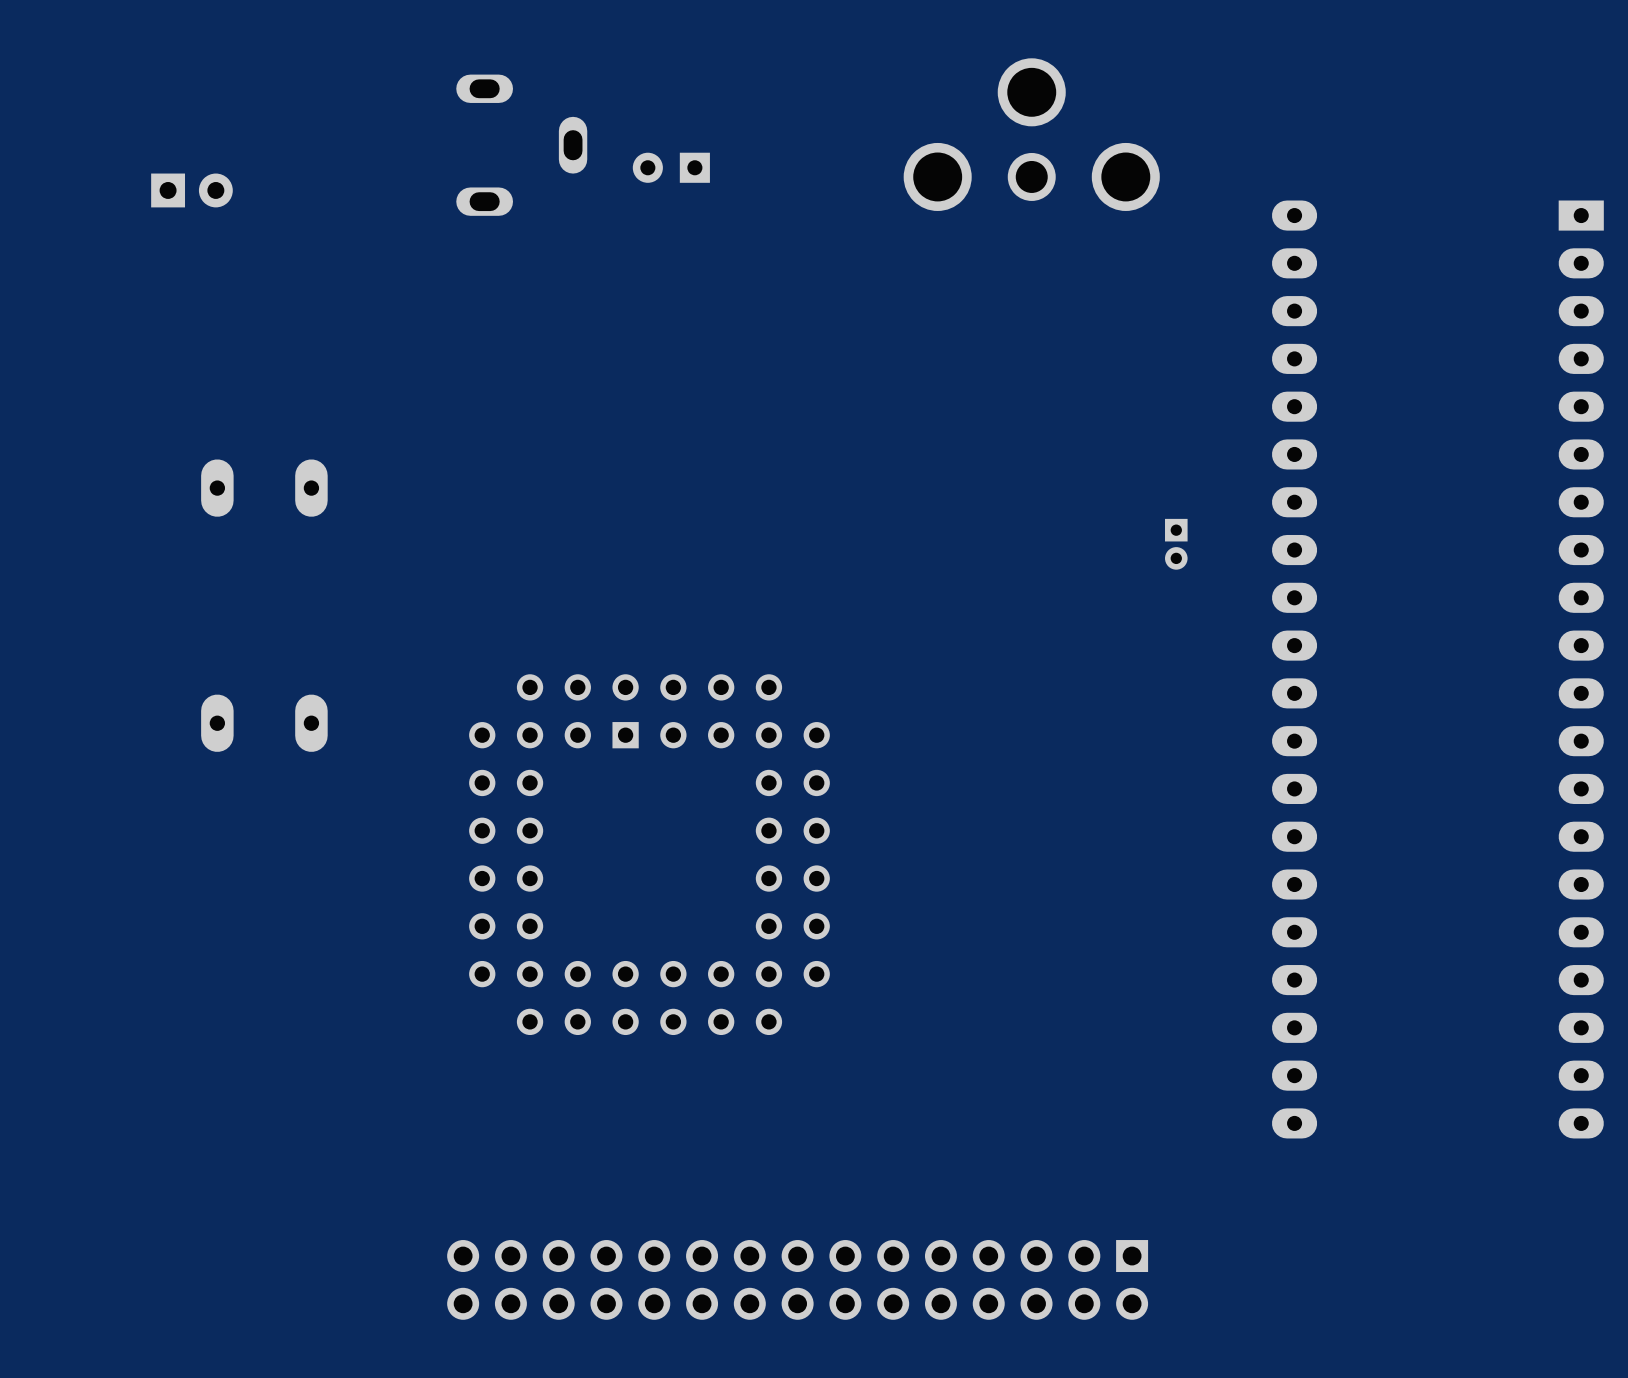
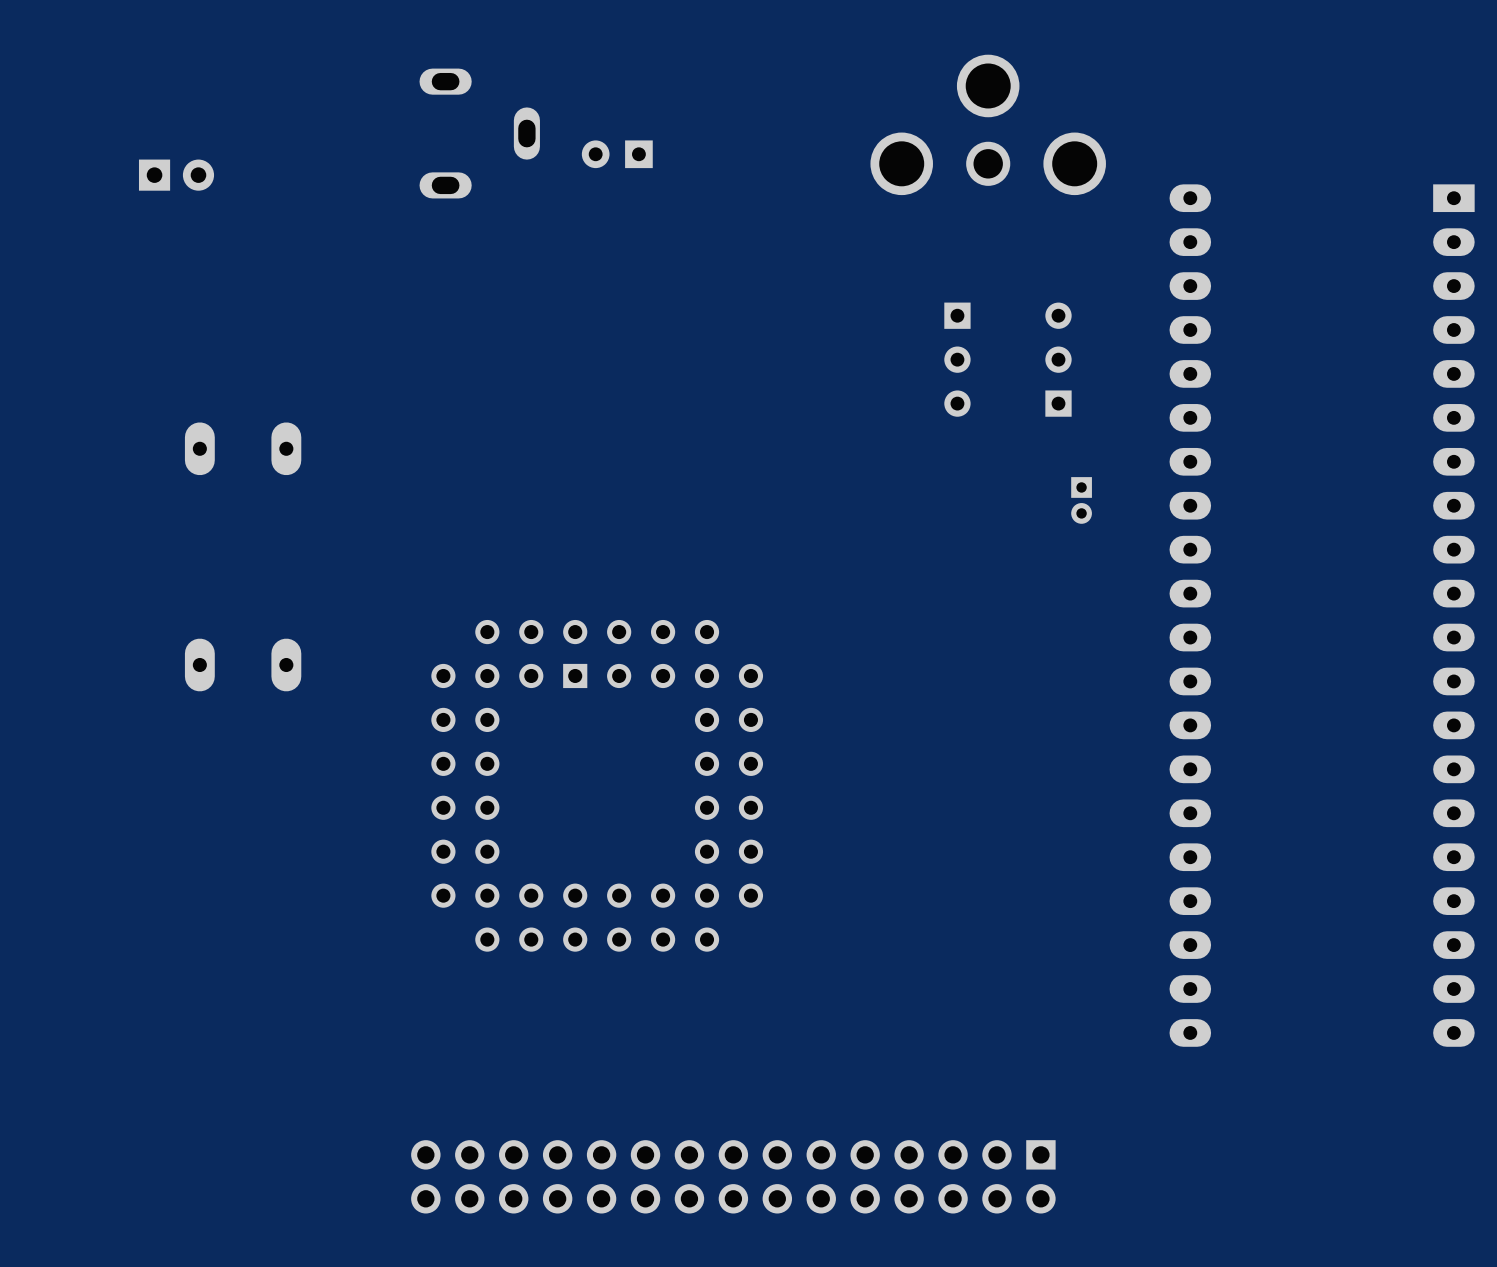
part position: (1031, 134) -> (988, 124)
part: none -> (957, 359)
part: none -> (1058, 359)

